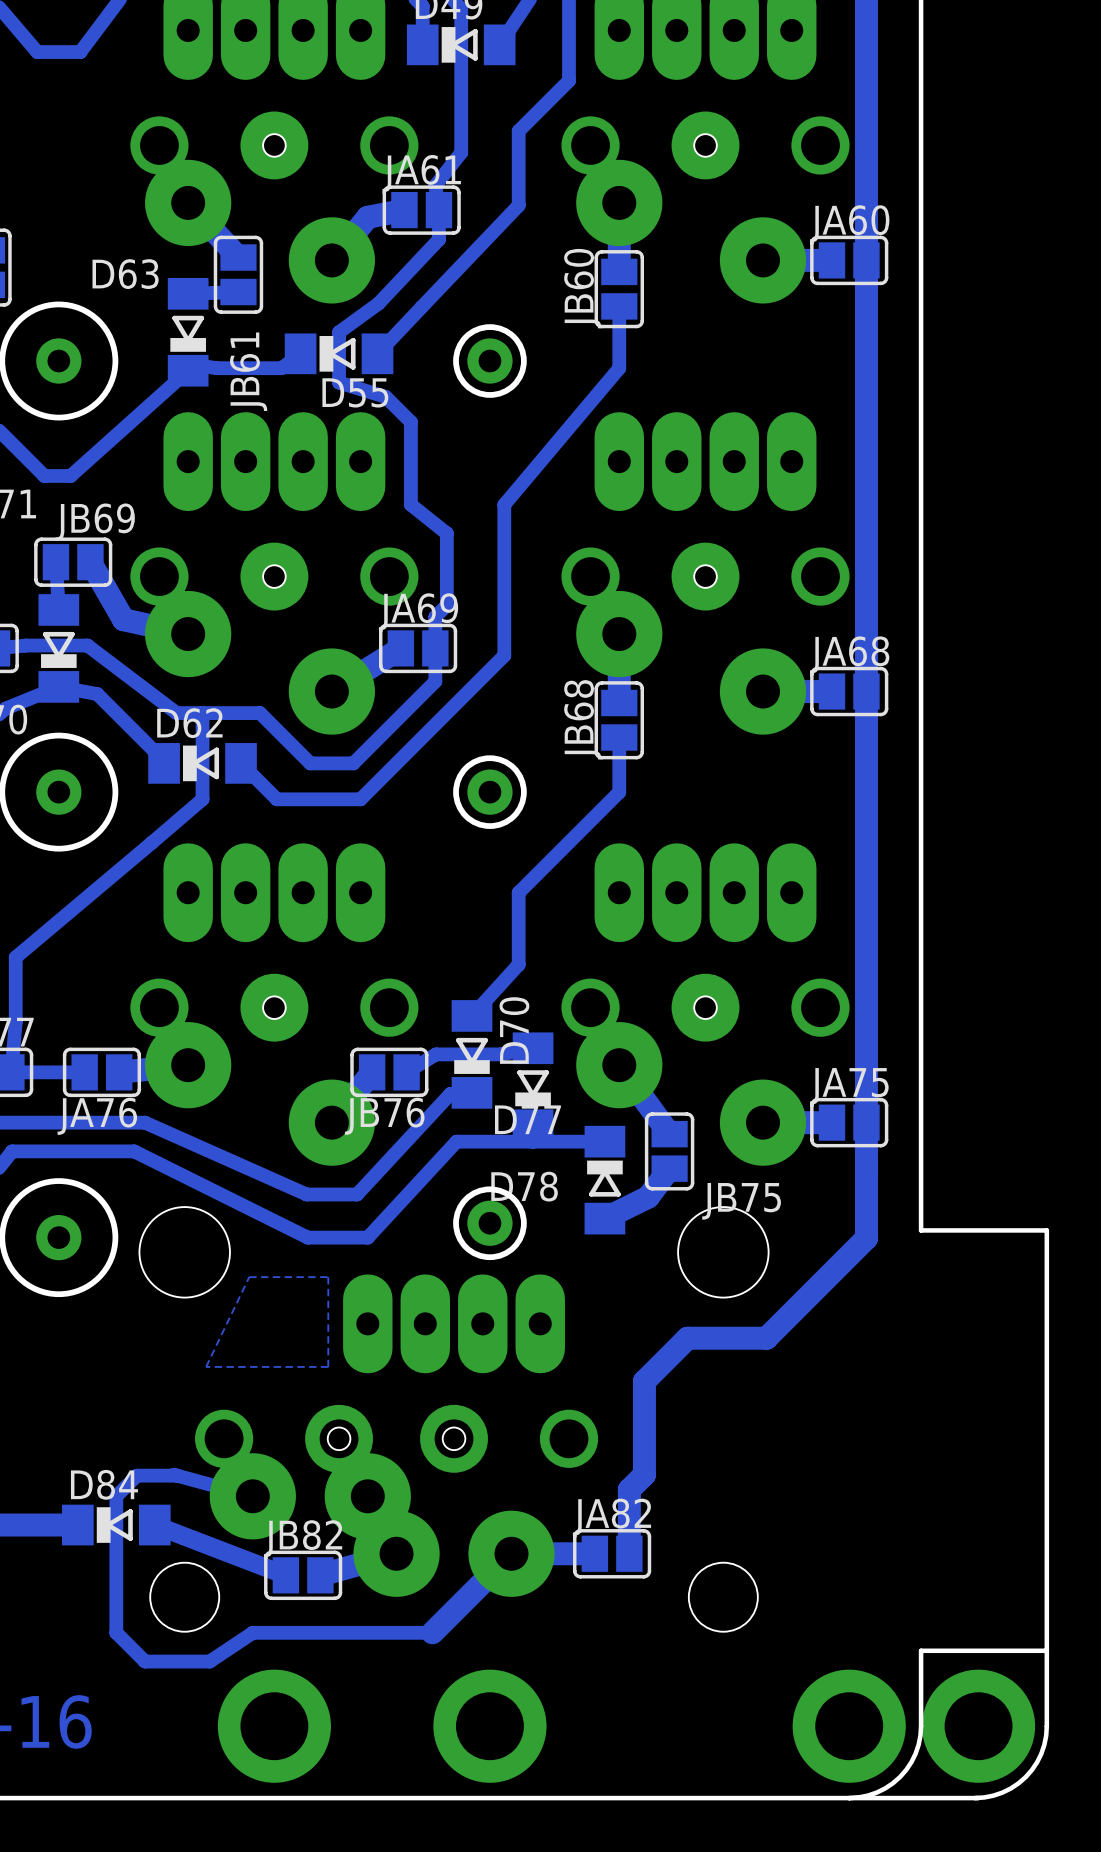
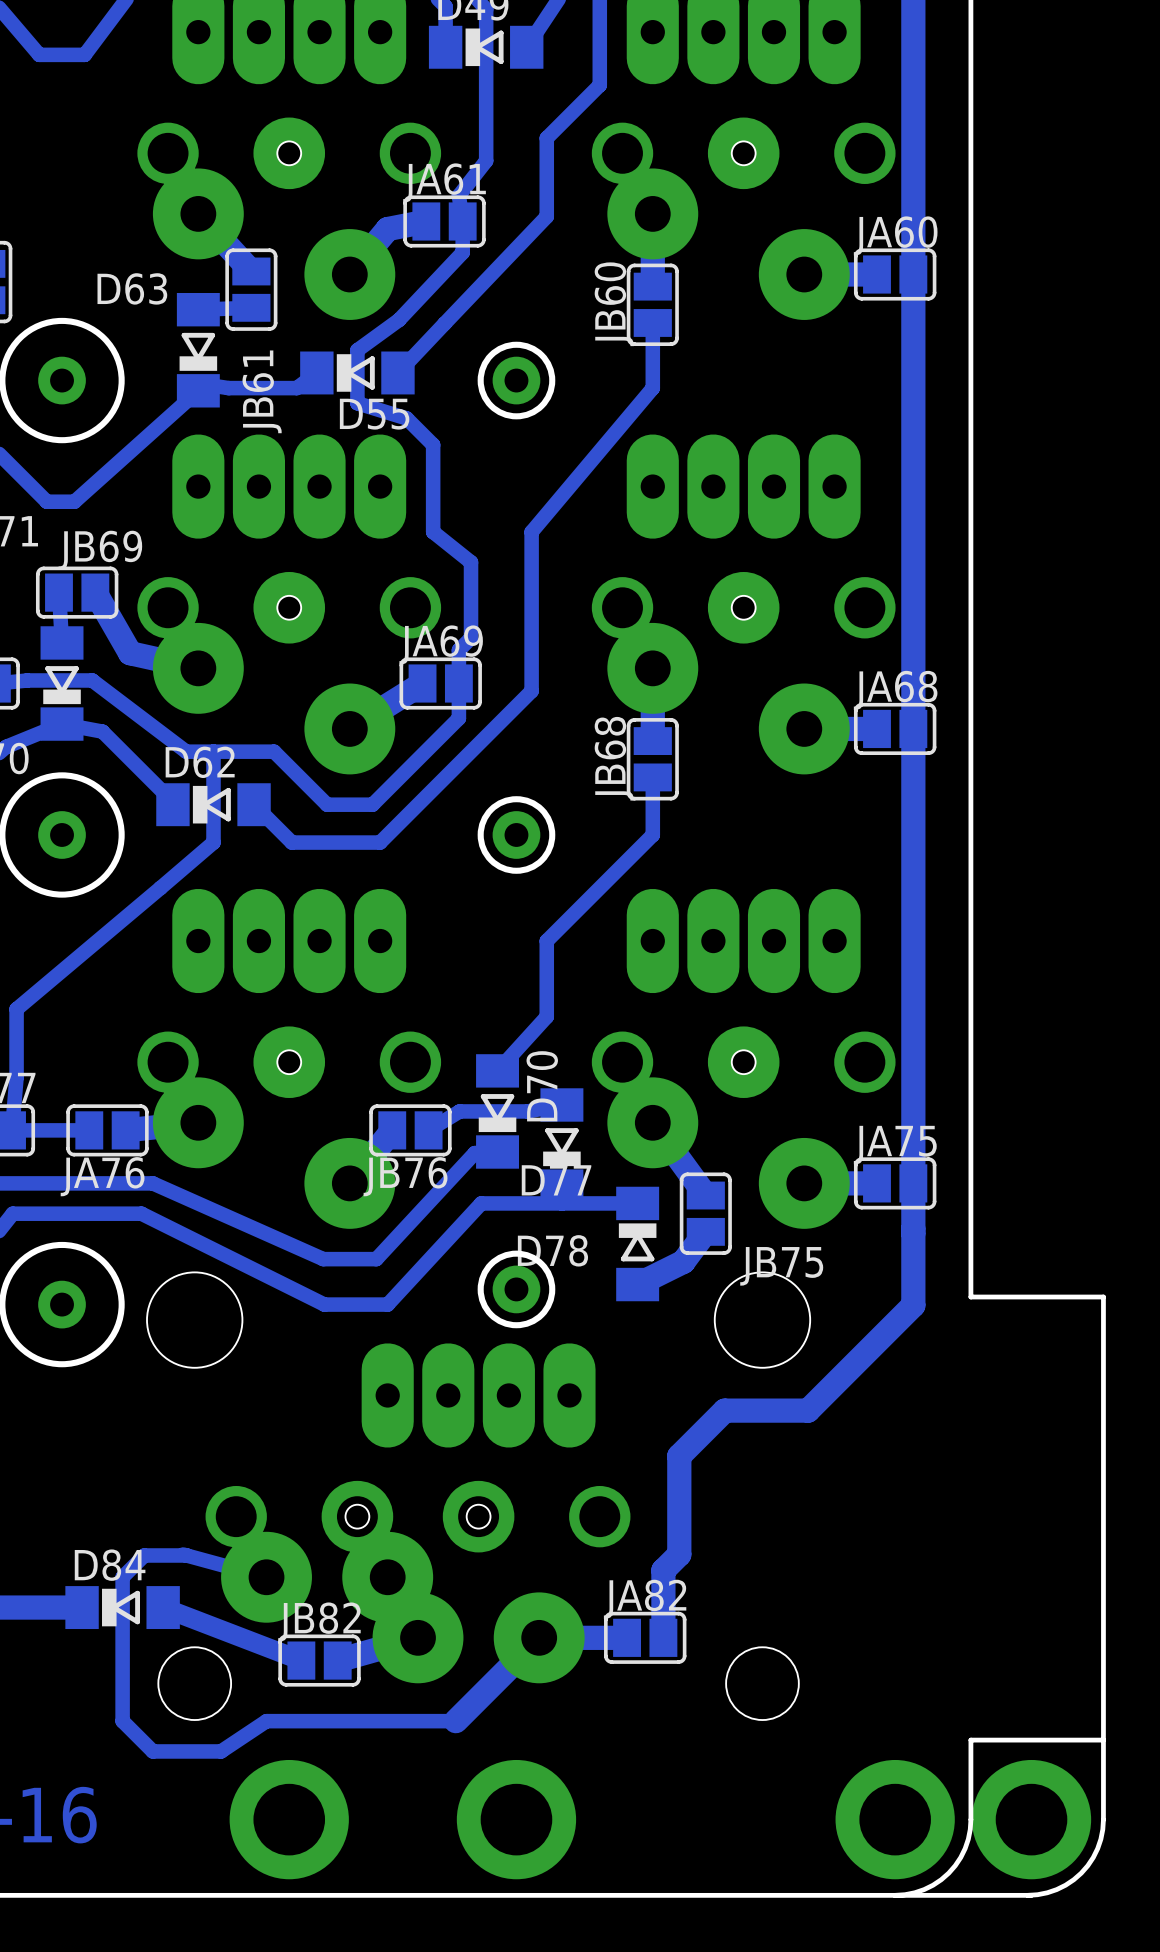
zone outline: (328, 1277) (328, 1366) (206, 1366) (249, 1277) (328, 1277) -> none

